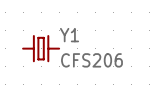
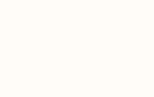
Y1: CFS206 (41, 48) -> none

